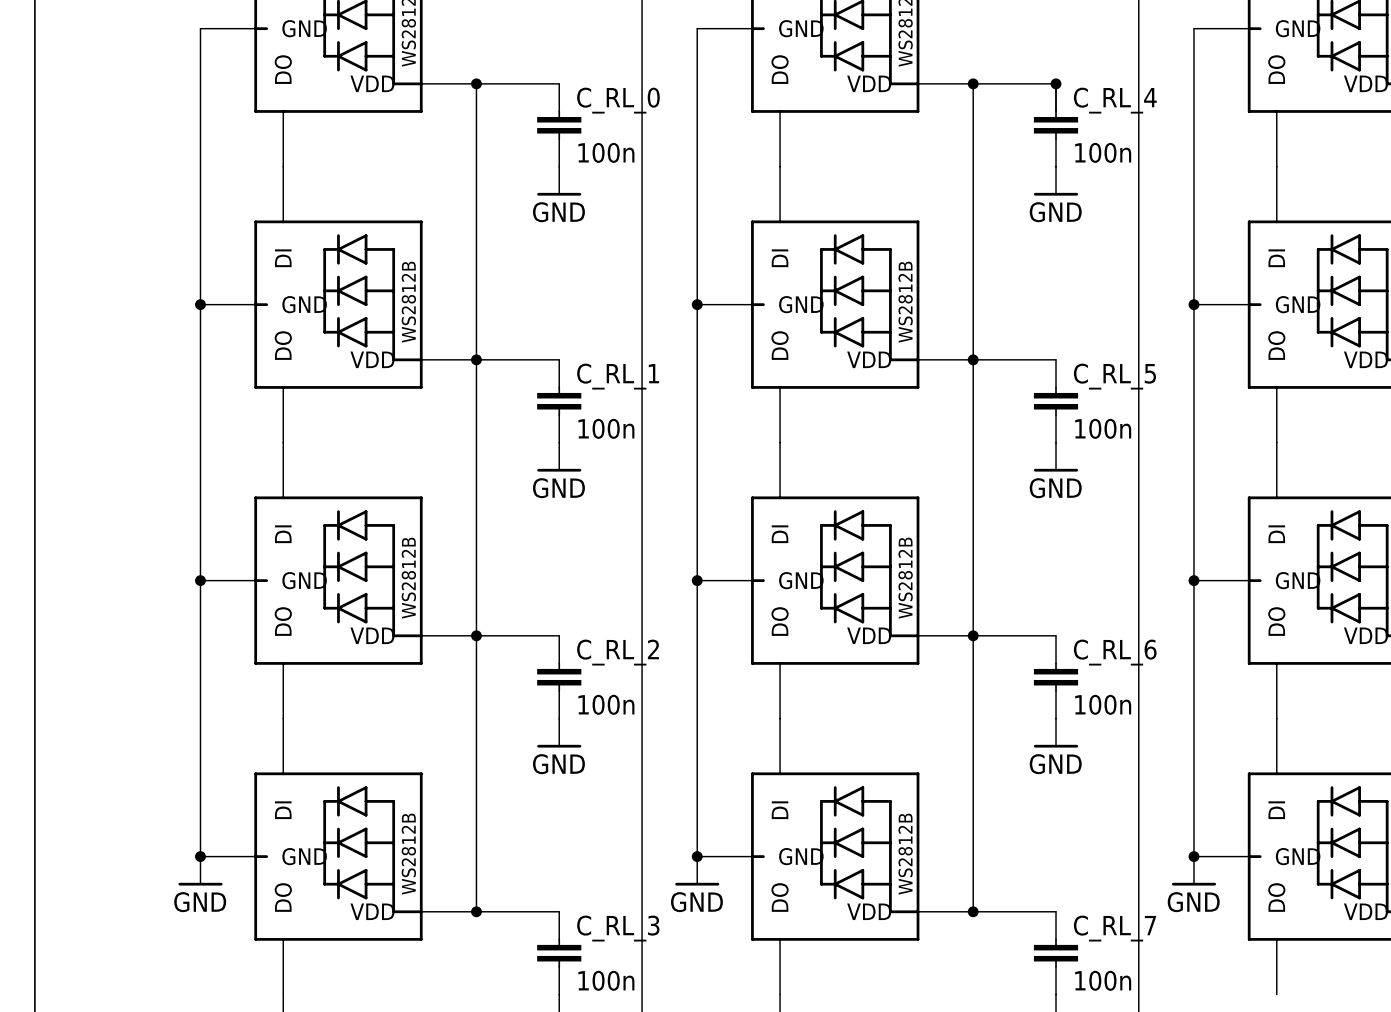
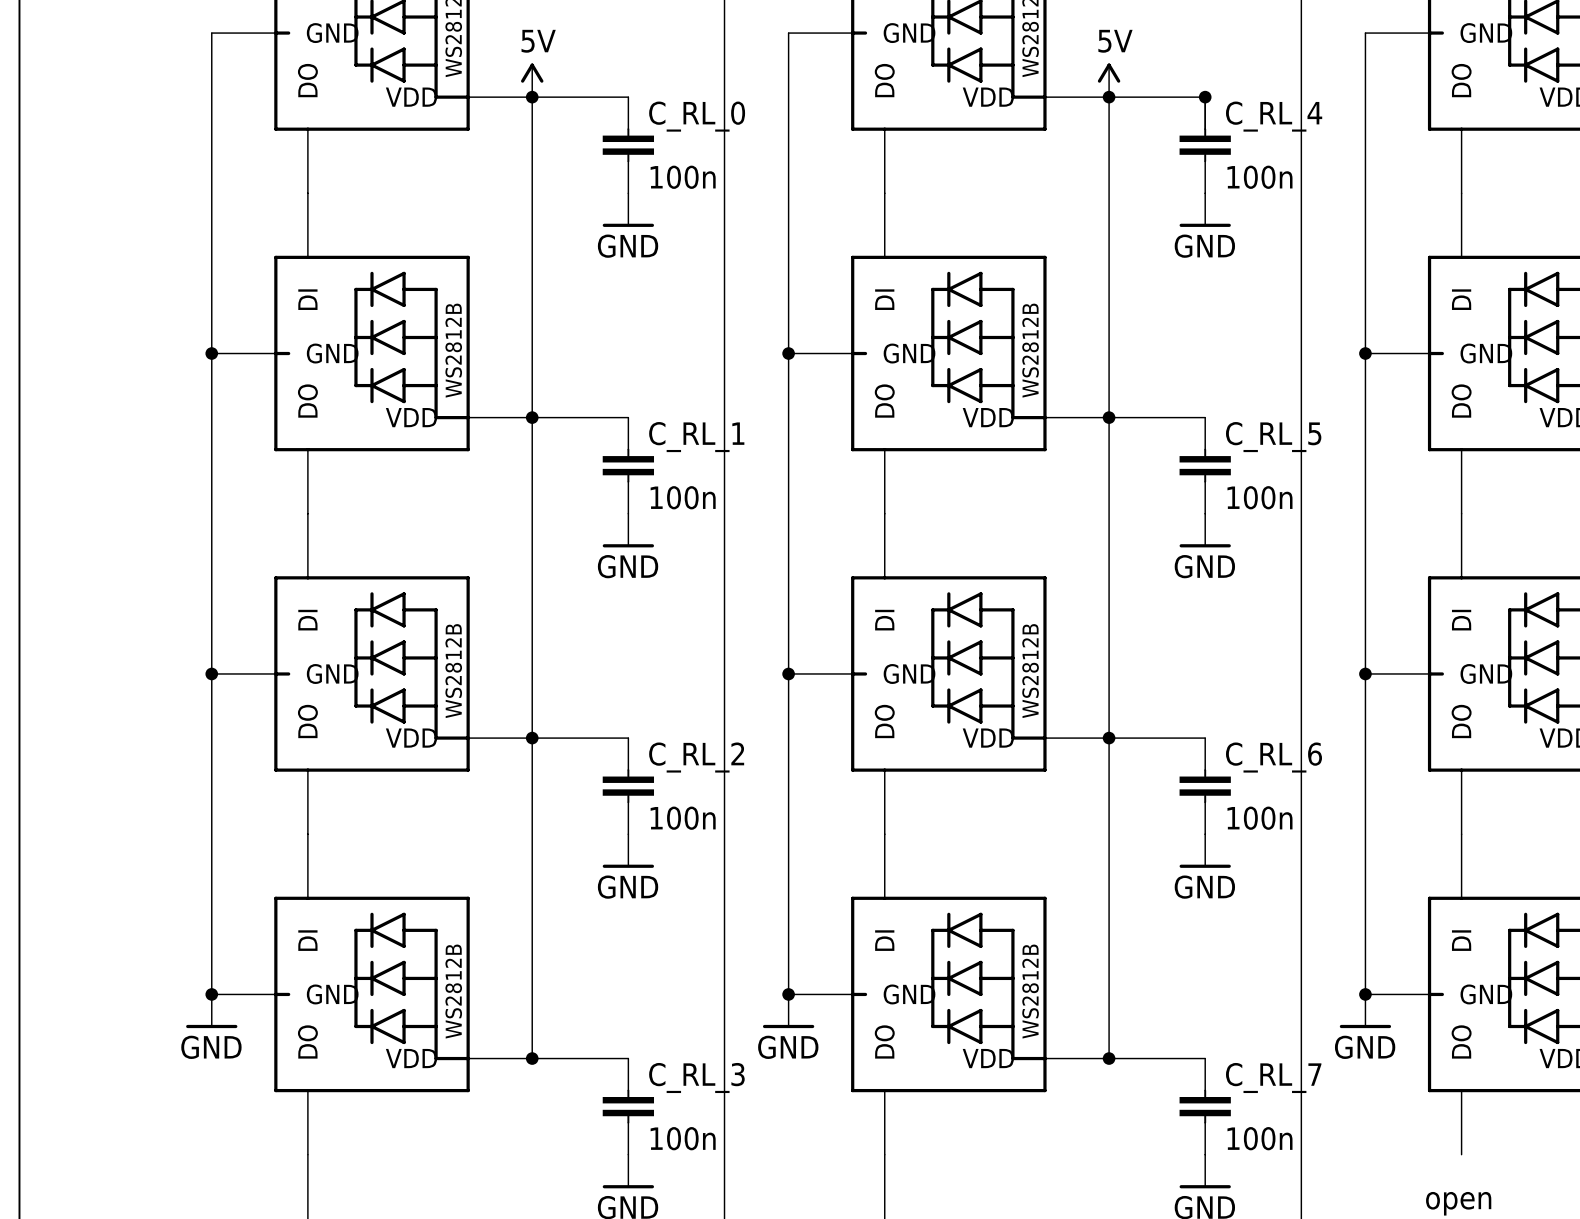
power symbol: none -> 5V (532, 80)
power symbol: none -> 5V (1109, 80)

